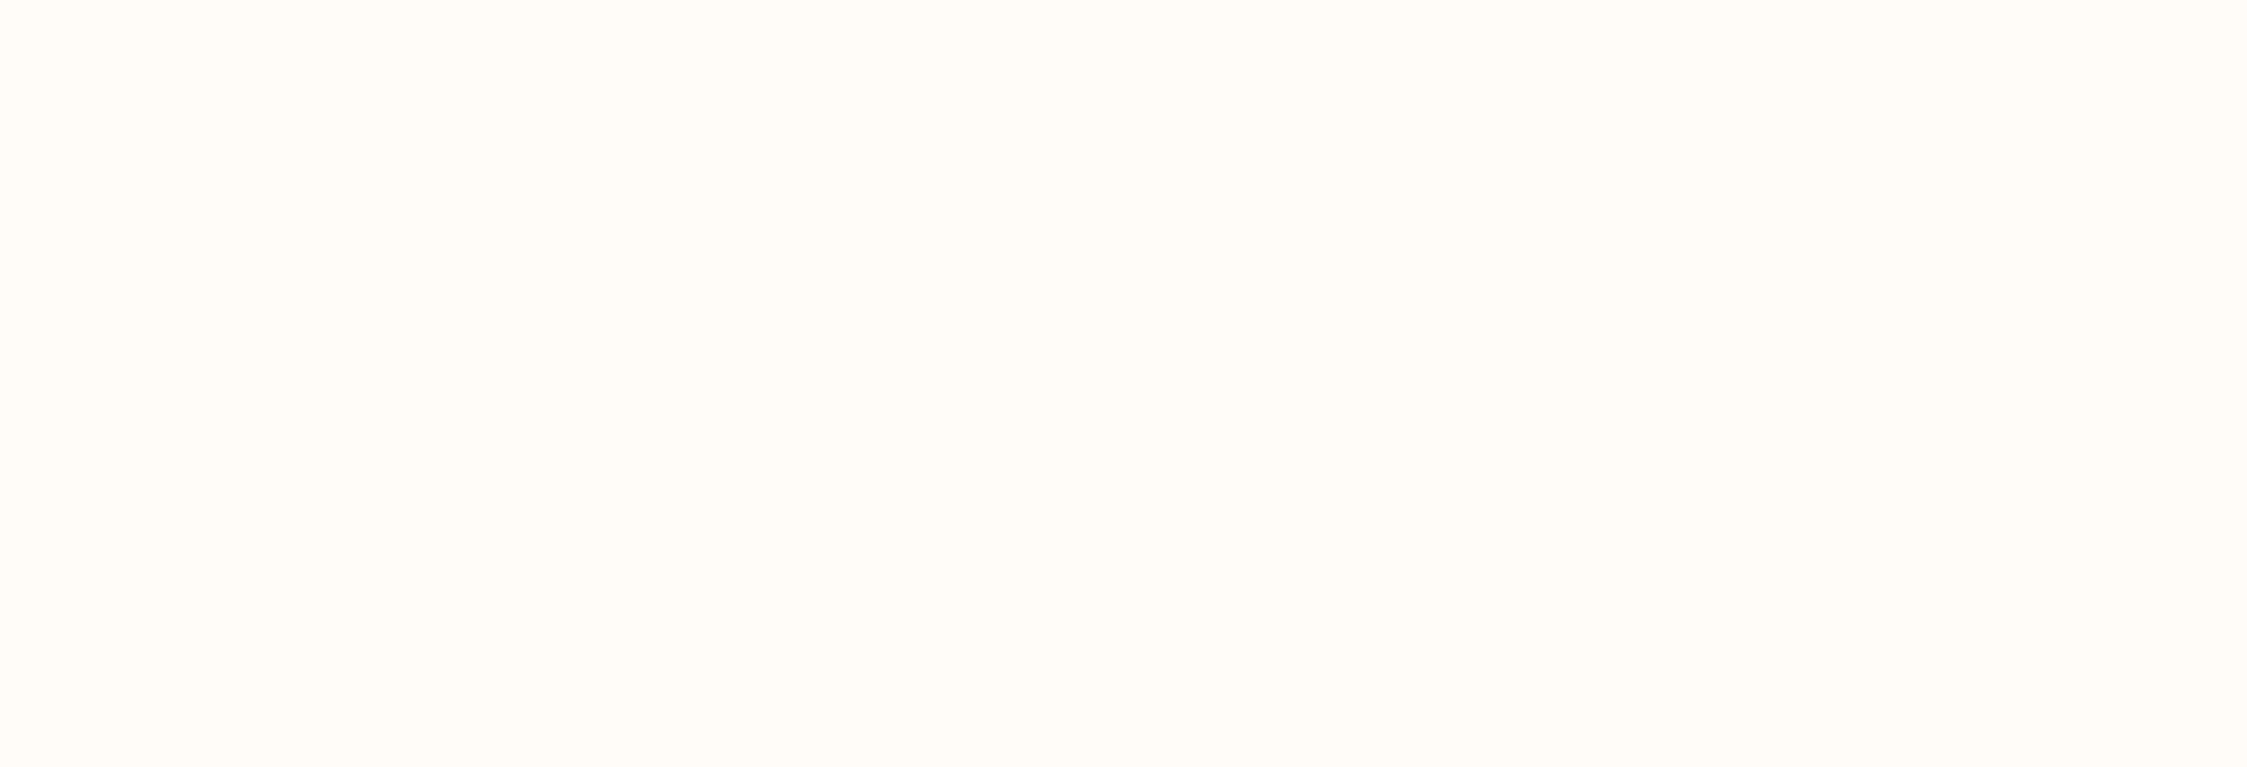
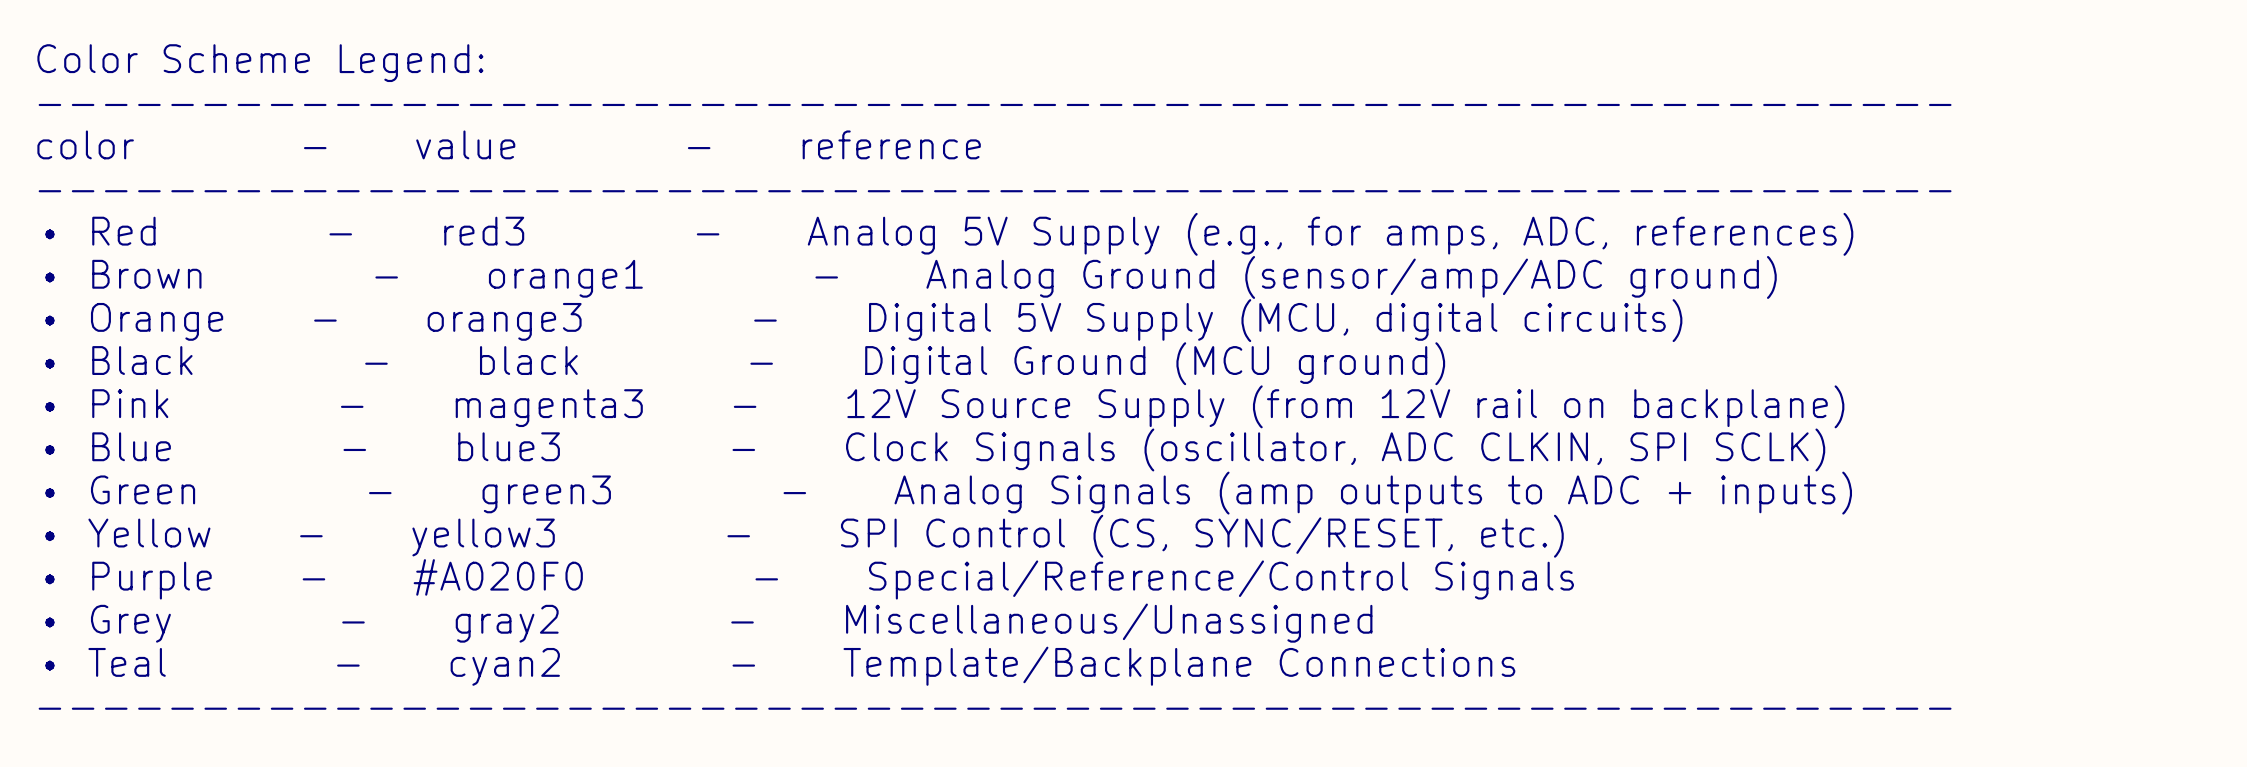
text: none -> Color Scheme Legend: (260, 63)
text: none -> ---------------------------------------------------------- (995, 104)
text: none -> color - value - reference (509, 144)
text: none -> ---------------------------------------------------------- (995, 191)
text: none -> • Red - red3 - Analog 5V Supply (e.g., for amps, ADC, references) (949, 234)
text: none -> • Brown - orange1 - Analog Ground (sensor/amp/ADC ground) (910, 277)
text: none -> • Orange - orange3 - Digital 5V Supply (MCU, digital circuits) (863, 320)
text: none -> • Black - black - Digital Ground (MCU ground) (745, 363)
text: none -> • Pink - magenta3 - 12V Source Supply (from 12V rail on backplane) (944, 406)
text: none -> • Blue - blue3 - Clock Signals (oscillator, ADC CLKIN, SPI SCLK) (935, 449)
text: none -> • Green - green3 - Analog Signals (amp outputs to ADC + inputs) (948, 493)
text: none -> • Yellow - yellow3 - SPI Control (CS, SYNC/RESET, etc.) (804, 536)
text: none -> • Purple - #A020F0 - Special/Reference/Control Signals (809, 579)
text: none -> • Grey - gray2 - Miscellaneous/Unassigned (708, 623)
text: none -> • Teal - cyan2 - Template/Backplane Connections (780, 666)
text: none -> ---------------------------------------------------------- (995, 708)

